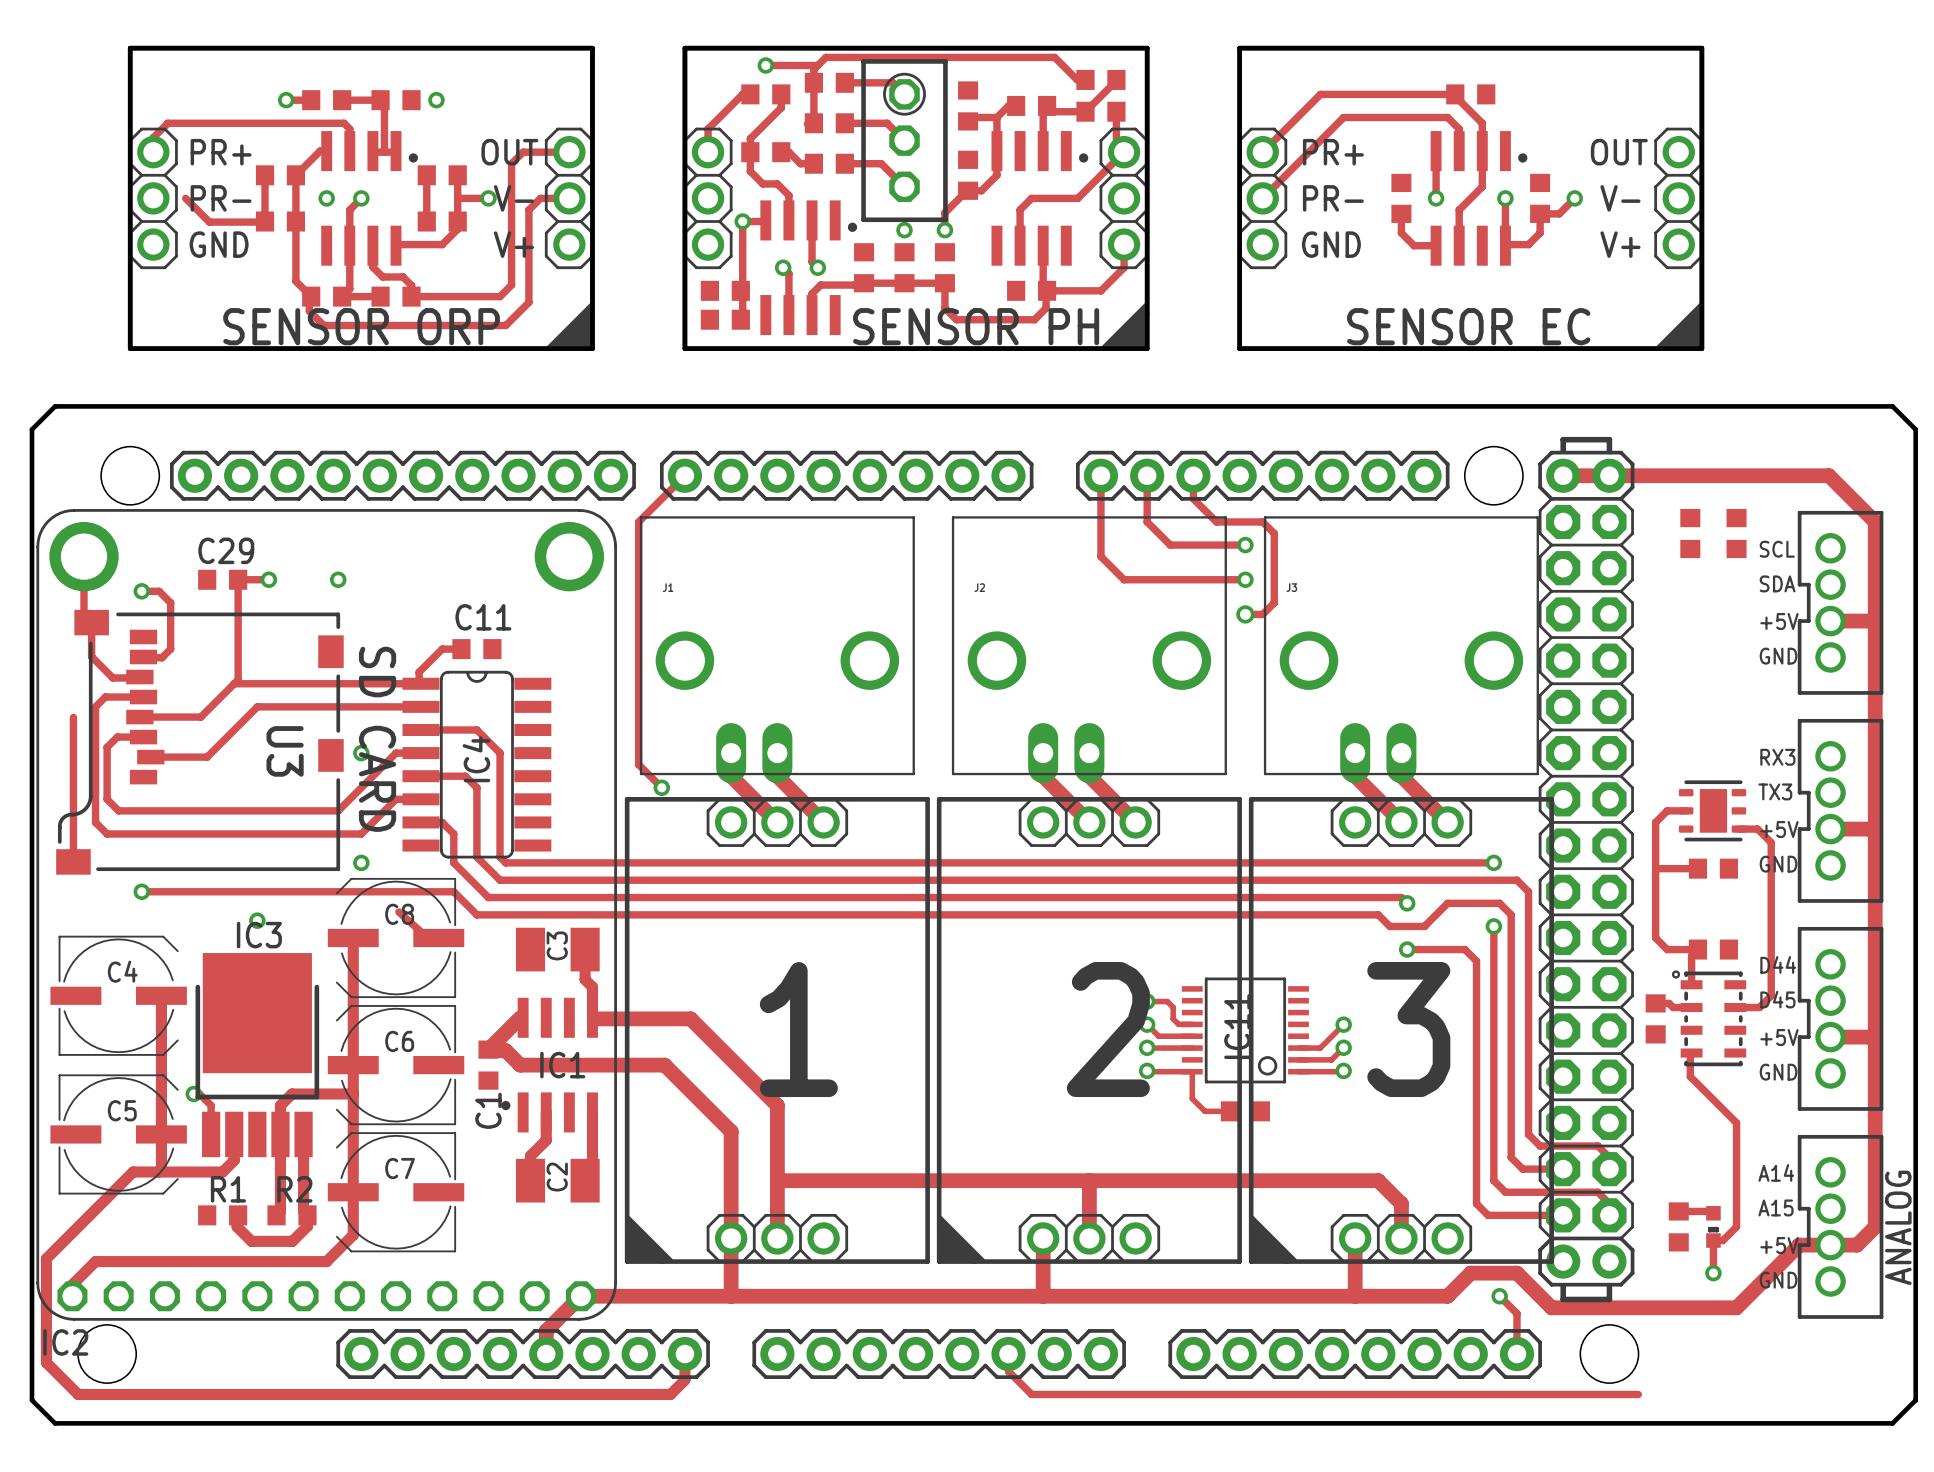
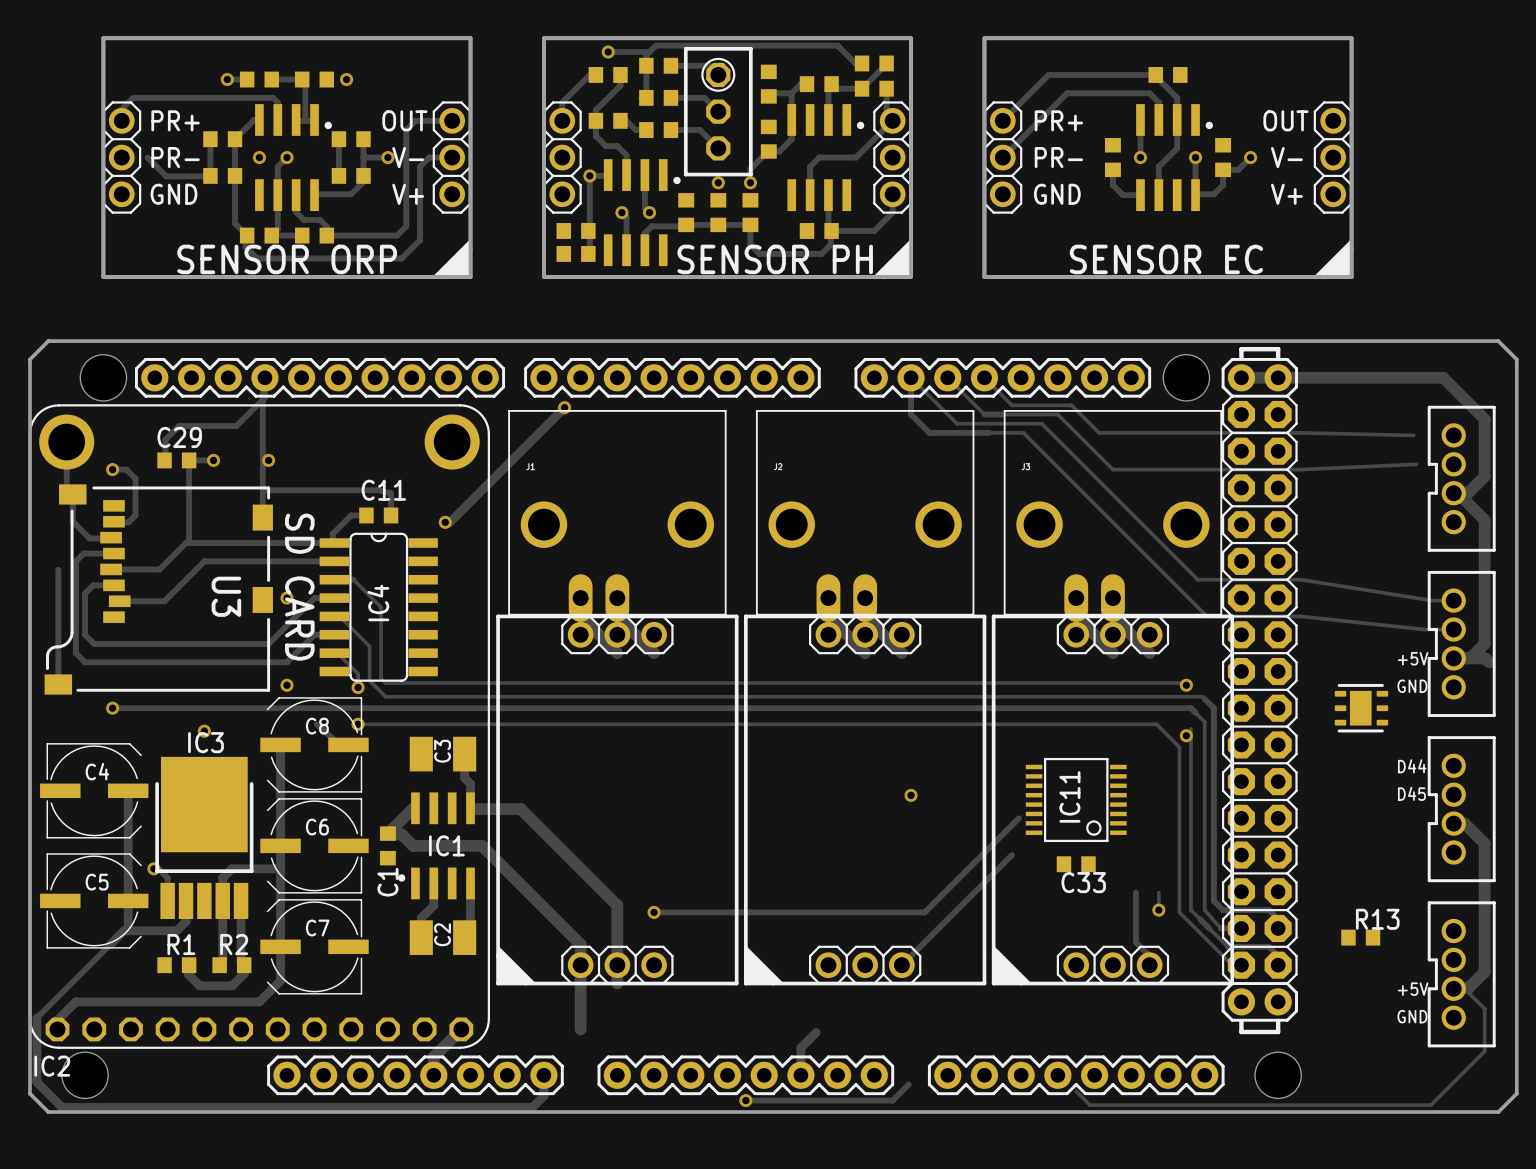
board edge: (55, 406) (1892, 406) (1915, 429) (1915, 1400) (1892, 1423) (55, 1423) (32, 1400) (32, 429) (55, 406) -> (48, 341) (30, 359) (30, 1093) (48, 1112) (1498, 1112) (1516, 1093) (1516, 359) (1498, 341) (48, 341)
track: (684, 475) (638, 521) (638, 764) (661, 787) -> none
track: (1100, 475) (1100, 556) (1124, 579) (1245, 579) -> none
track: none -> (911, 377) (956, 423) (1041, 423) (1197, 579) (1301, 579) (1432, 600) (1453, 600)
track: (1193, 475) (1193, 498) (1216, 521) (1239, 521) -> (947, 377) (984, 414)
track: none -> (984, 377) (1012, 405) (1071, 405) (1099, 432) (1301, 432) (1413, 435)
track: (1817, 475) (1829, 475) (1875, 521) (1875, 1226) (1857, 1245) (1844, 1245) -> (1443, 377) (1484, 419) (1484, 476) (1468, 492) (1453, 493)
track: none -> (564, 407) (449, 522) (445, 522)
via: none -> (564, 407)
track: (1262, 521) (1274, 533) (1274, 602) (1262, 614) (1245, 614) -> (1002, 414) (1057, 414) (1112, 469) (1301, 469) (1416, 464)
part: (1690, 533) -> none
part: (1736, 533) -> none
track: none -> (989, 432) (1023, 432) (1207, 616) (1301, 616) (1424, 629) (1453, 629)
via: (1245, 545) -> none
text: SCL (1777, 549) -> none
track: none -> (165, 459) (165, 439) (179, 426) (236, 426) (264, 397) (264, 377) (262, 379) (262, 517)
via: (1245, 579) -> none
text: SDA (1777, 583) -> none
track: none -> (262, 487) (265, 490) (378, 490) (391, 493) (391, 515)
via: (1245, 614) -> none
text: +5V (1779, 621) -> none
track: (1835, 621) (1875, 621) -> (1457, 493) (1484, 520) (1484, 643) (1470, 657) (1453, 658)
text: GND (1778, 656) -> none
via: none -> (445, 522)
track: (445, 729) (476, 729) (500, 753) (500, 857) (505, 862) (1493, 862) -> (353, 579) (381, 607) (381, 678) (385, 682) (1190, 682)
text: RX3 (1777, 757) -> none
track: (427, 776) (465, 776) (476, 787) (476, 857) (500, 880) (1516, 880) -> (339, 616) (369, 646) (369, 680) (385, 696) (1202, 696) (1204, 699)
via: (661, 787) -> none
text: TX3 (1775, 791) -> none
track: (1686, 810) (1667, 810) (1655, 822) (1655, 938) (1667, 949) (1697, 949) (1691, 955) (1691, 984) -> none
part rotation: 0° (1712, 810) -> 180° (1361, 708)
part position: (1712, 810) -> (1361, 708)
track: (424, 822) (442, 822) (453, 833) (453, 862) (488, 897) (1401, 897) (1407, 903) -> (337, 653) (358, 673) (358, 687)
track: (1738, 829) (1757, 829) (1771, 842) (1771, 995) (1759, 1007) (1735, 1007) -> none
via: none -> (358, 687)
track: (1655, 868) (1697, 868) -> none
part: (1713, 868) -> none
track: (453, 891) (476, 914) (1378, 914) (1389, 926) (1424, 926) (1447, 903) (1499, 903) (1511, 914) (1511, 1157) -> (360, 708) (1190, 708) (1195, 712)
track: none -> (1193, 710) (1204, 721) (1204, 910) (1220, 928)
via: (1407, 903) -> none
via: none -> (358, 724)
track: none -> (1190, 728) (1190, 910) (1200, 919)
track: (1493, 926) (1493, 1180) (1505, 1192) (1545, 1192) -> none
track: (1407, 949) (1464, 949) (1476, 961) (1476, 1203) (1488, 1215) (1551, 1215) -> (358, 724) (1156, 724) (1179, 747) (1179, 912) (1232, 965)
via: (1407, 949) -> none
part: (1713, 949) -> none
track: (1147, 1001) (1167, 1001) (1173, 1007) (1173, 1018) (1178, 1024) (1192, 1024) -> none
track: (1655, 1003) (1669, 1003) (1673, 1007) (1691, 1007) -> none
track: (656, 1018) (690, 1018) (777, 1105) (777, 1140) -> (521, 809) (617, 905)
part: (1655, 1018) -> none
part: (1709, 1018) -> none
track: (1147, 1024) (1158, 1036) (1192, 1036) -> none
via: (1147, 1024) -> none
track: (1343, 1024) (1320, 1048) (1298, 1048) -> none
via: (1343, 1024) -> none
text: 1 (798, 1029) -> none
text: 2 (1108, 1029) -> none
text: 3 (1408, 1029) -> none
part position: (777, 1030) -> (617, 799)
part position: (1089, 1030) -> (865, 799)
IC11 position: (1245, 1030) -> (1076, 799)
track: none -> (1018, 818) (924, 912) (654, 912)
part position: (1401, 1030) -> (1112, 799)
text: +5V (1779, 1037) -> none
track: (1844, 1037) (1870, 1037) (1875, 1042) -> (1464, 823) (1484, 843) (1484, 972) (1468, 988) (1453, 988)
track: (1147, 1047) (1192, 1048) -> none
via: (1147, 1047) -> none
track: (1343, 1047) (1331, 1059) (1298, 1059) -> none
via: (1343, 1047) -> none
track: (1691, 1053) (1690, 1076) (1736, 1122) (1736, 1226) (1722, 1240) (1713, 1240) (1713, 1273) -> none
track: (606, 1065) (664, 1065) (731, 1131) (731, 1189) -> (481, 845) (580, 944)
track: (1147, 1070) (1192, 1071) (1192, 1098) (1204, 1111) (1229, 1111) -> none
via: (1147, 1070) -> none
track: (1343, 1070) (1298, 1071) -> none
via: (1343, 1070) -> none
text: GND (1778, 1072) -> none
track: none -> (1012, 855) (901, 965)
C33: none -> (1076, 864)
part: (1245, 1111) -> none
track: none -> (1135, 892) (1135, 942) (1149, 956) (1149, 965)
track: none -> (1158, 892) (1158, 910)
via: none -> (1158, 910)
via: none -> (654, 912)
track: (1522, 1169) (1537, 1169) -> (1209, 928) (1227, 946)
track: (156, 1172) (133, 1172) (46, 1258) (46, 1281) -> (124, 930) (36, 1017)
text: A14 (1776, 1172) -> none
track: (777, 1180) (1378, 1180) (1401, 1203) (1401, 1238) -> none
track: (1089, 1180) (1089, 1238) -> none
R13: none -> (1360, 937)
text: A15 (1775, 1207) -> none
track: (1678, 1211) (1711, 1211) (1713, 1213) -> none
part: (1678, 1226) -> none
part: (1713, 1226) -> none
text: ANALOG (1898, 1227) -> none
track: (1043, 1238) (1043, 1296) -> none
track: (1355, 1238) (1355, 1296) -> none
track: (1830, 1245) (1799, 1245) (1736, 1307) (1551, 1307) (1516, 1273) (1470, 1273) (1447, 1296) (580, 1296) -> none
track: none -> (1464, 988) (1484, 1008) (1484, 1051) (1430, 1105) (1090, 1105) (1076, 1091)
via: (1713, 1273) -> none
track: (1499, 1296) (1516, 1313) (1516, 1354) -> none
via: (1499, 1296) -> none
track: (1008, 1354) (1008, 1371) (1031, 1394) (1638, 1394) -> (800, 1075) (800, 1047) (816, 1032)
track: none -> (908, 1084) (892, 1100) (745, 1100)
via: none -> (745, 1100)

